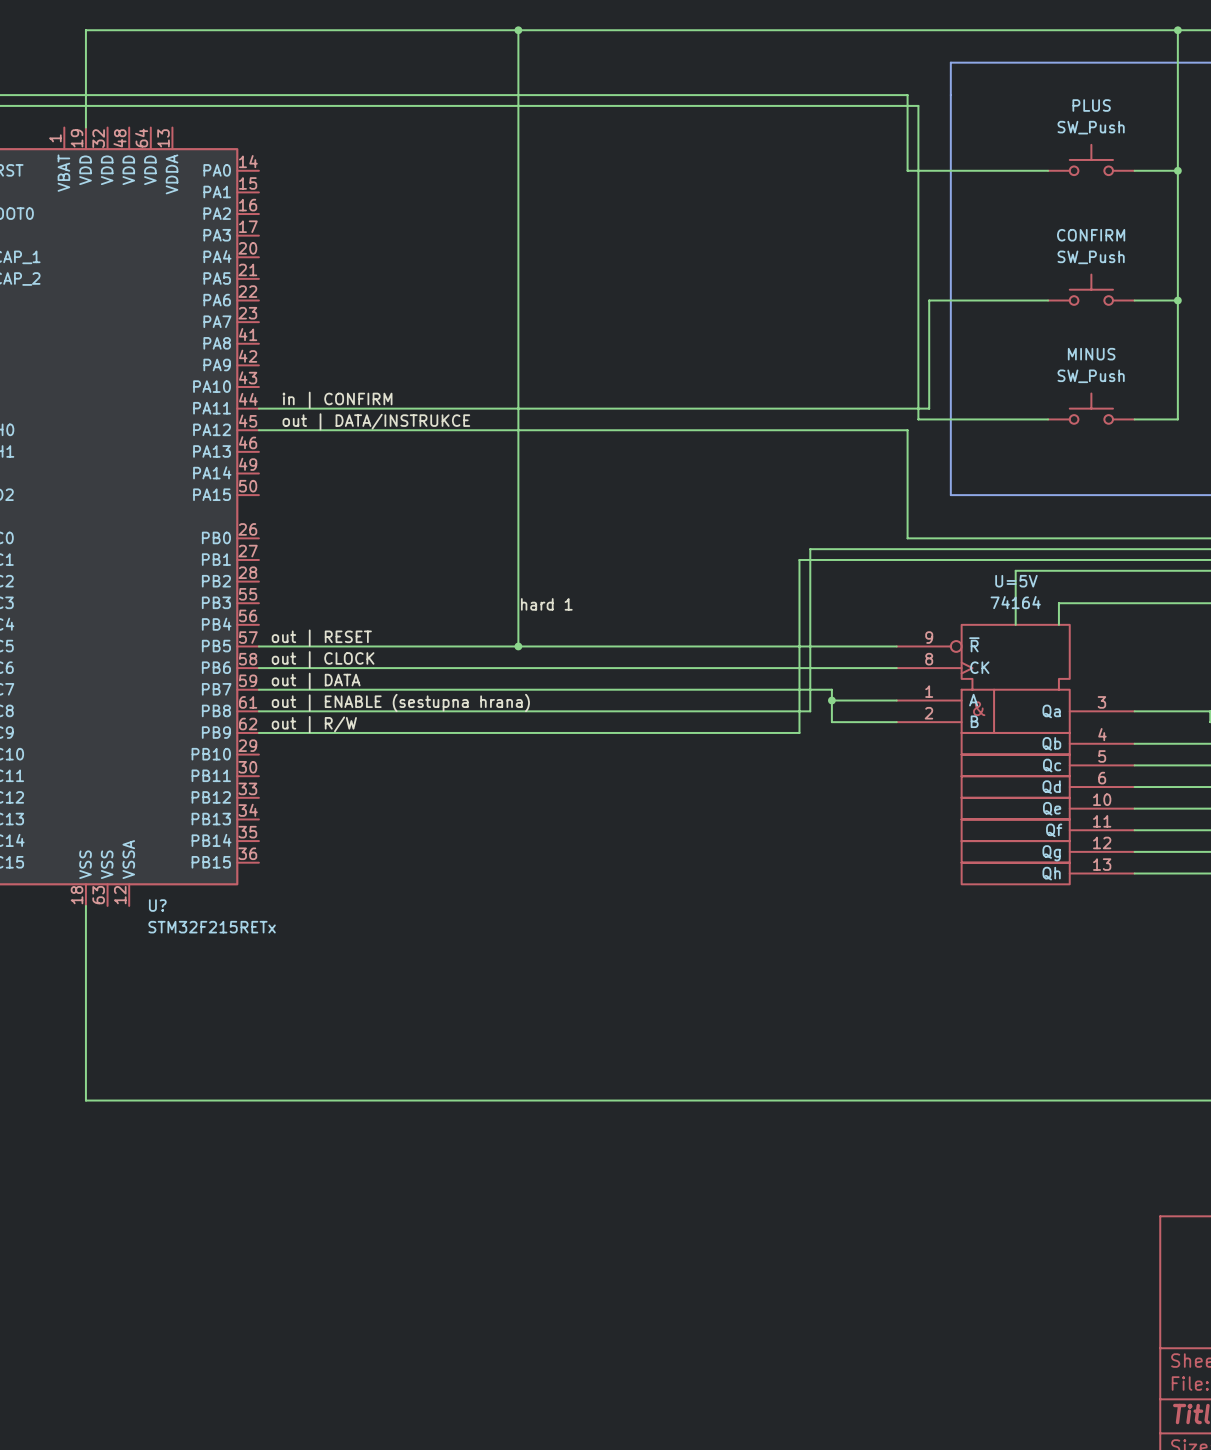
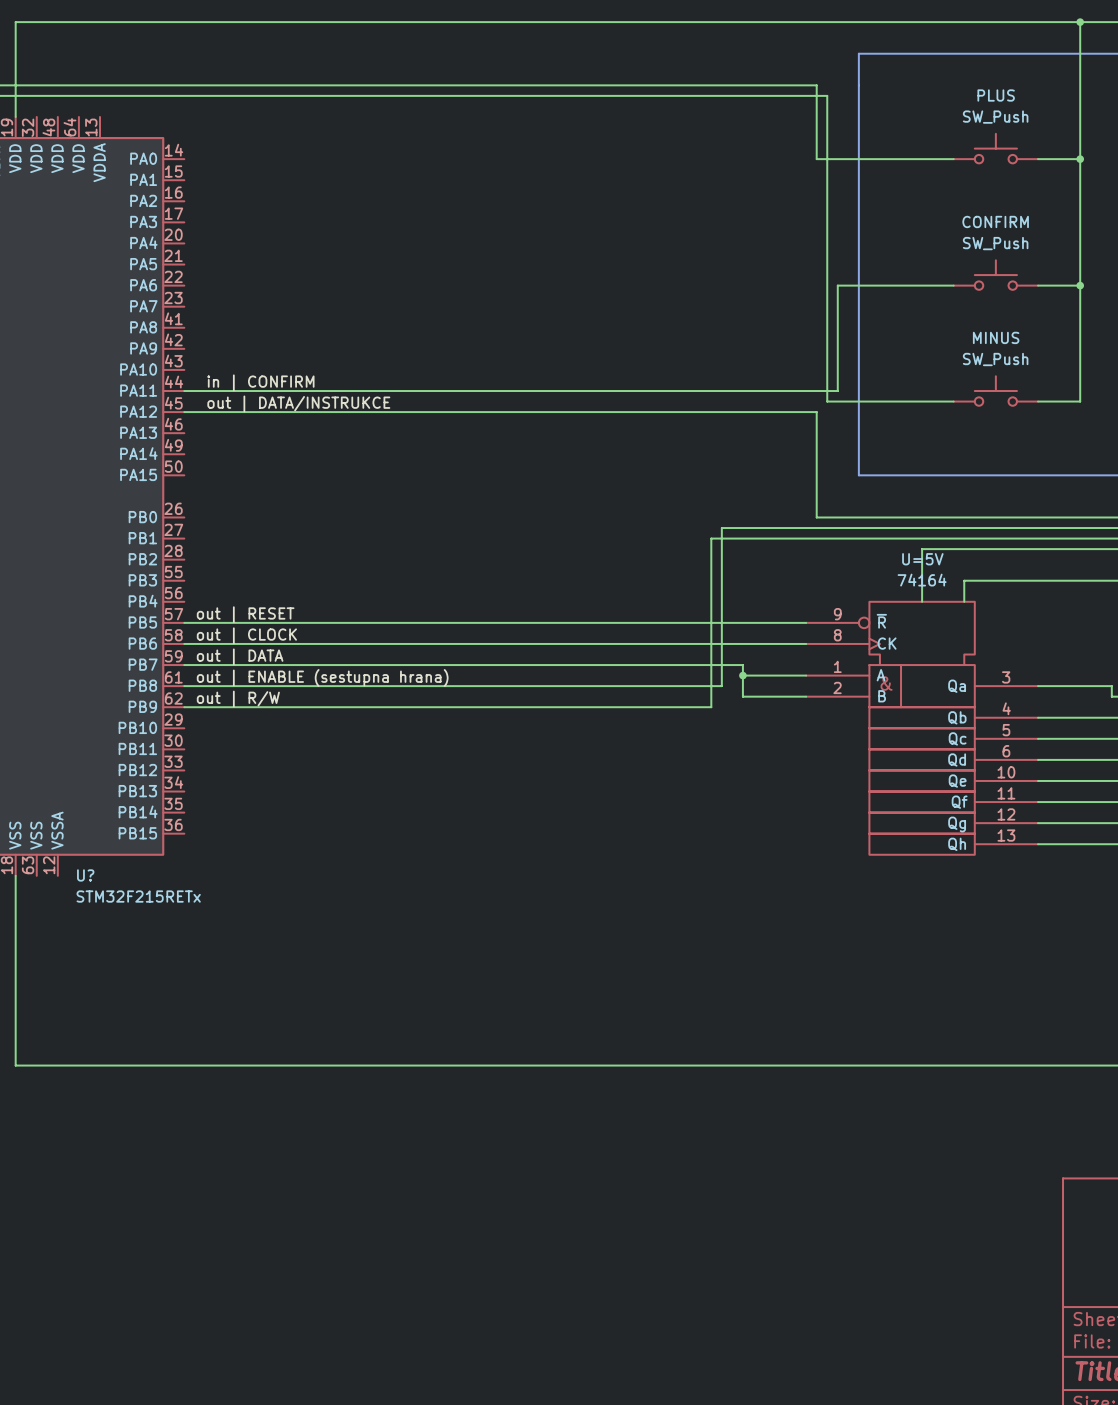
wire: (518, 30) (518, 646) -> none
junction: (518, 30) -> none
label: hard 1 (546, 604) -> none
junction: (518, 646) -> none

